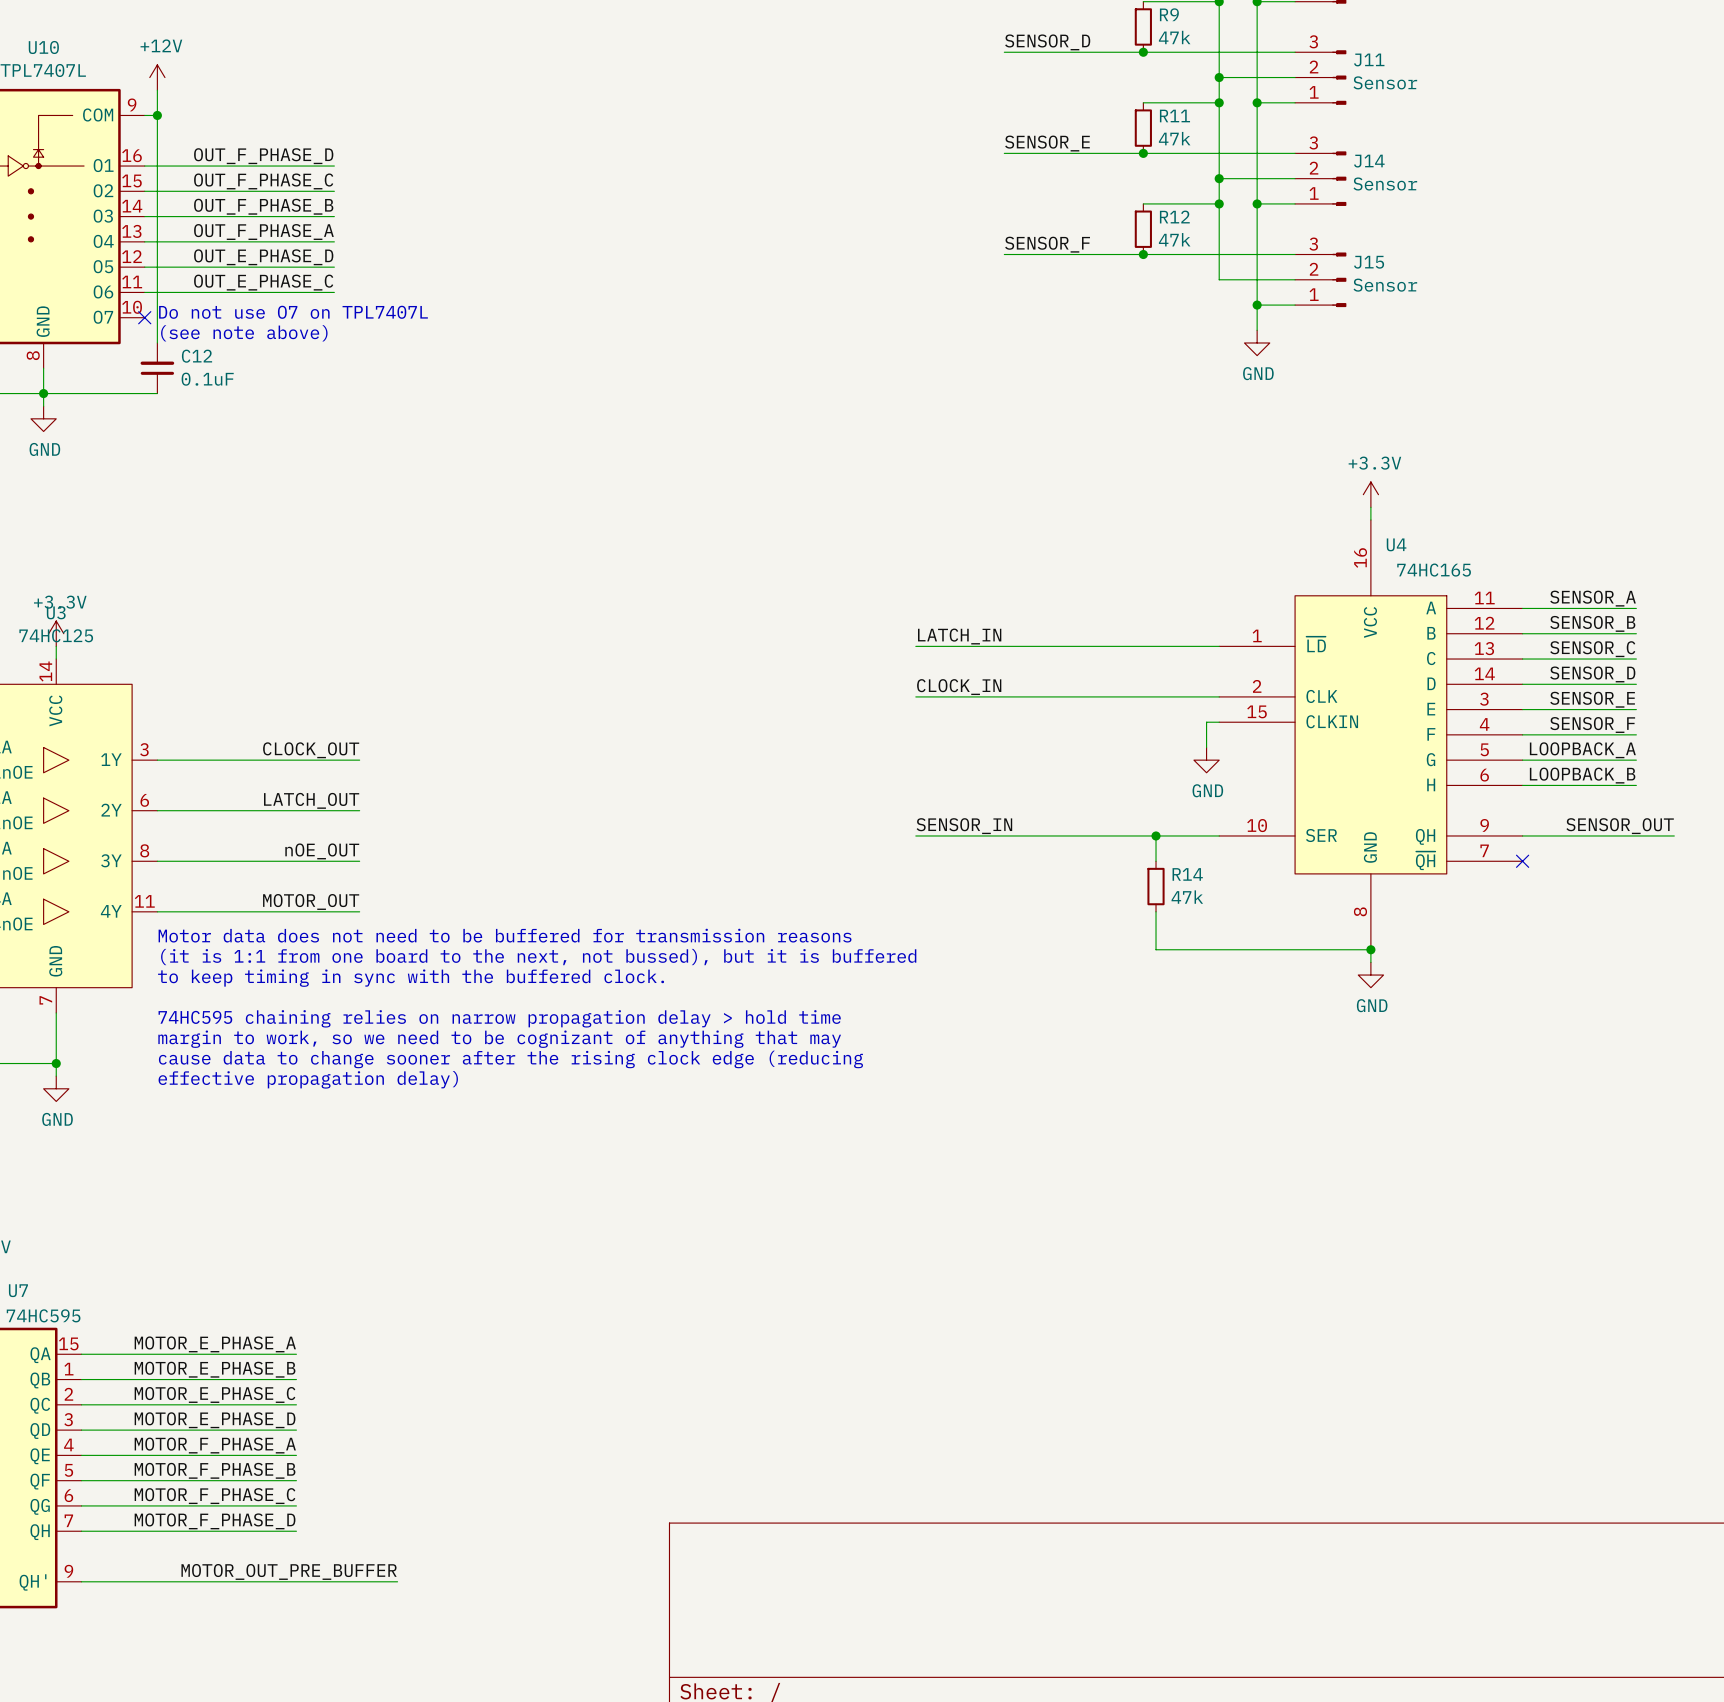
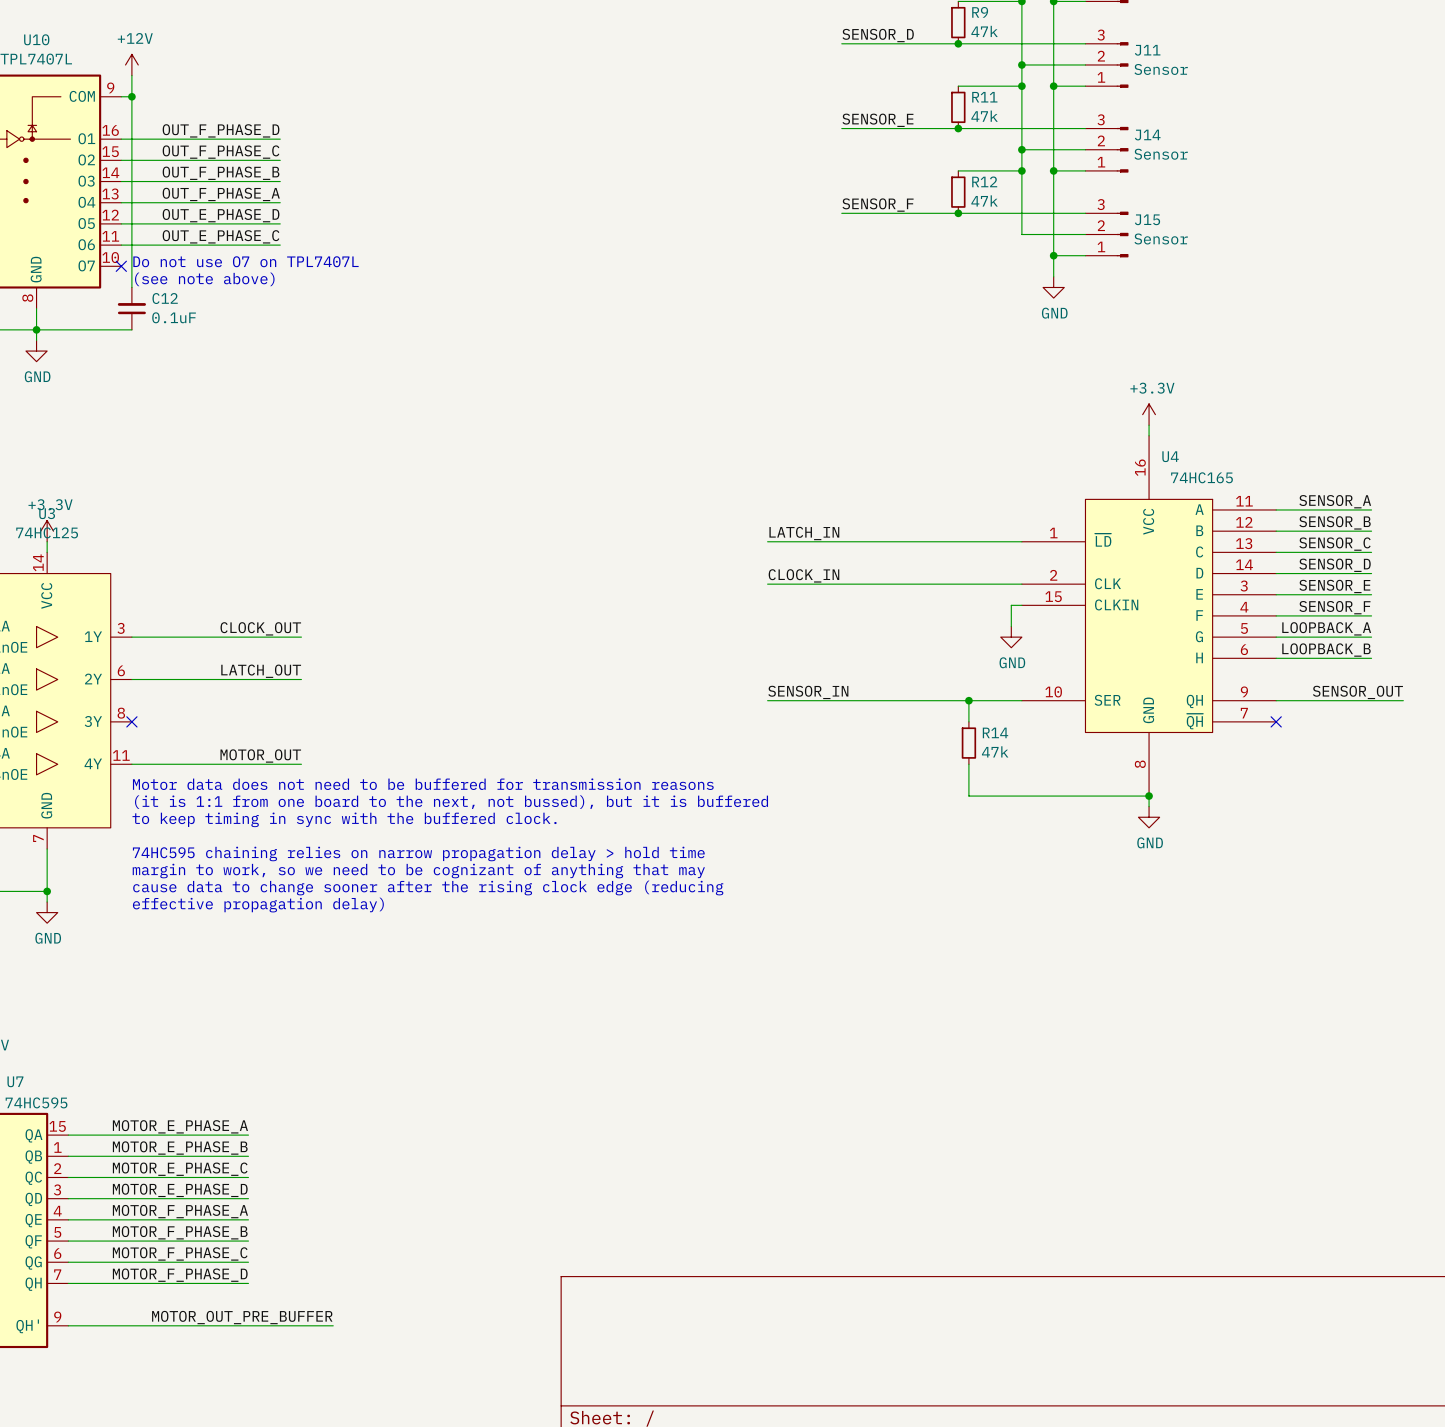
label: nOE_OUT (322, 851) -> none
wire: (157, 861) (359, 861) -> none
no-connect mark: none -> (131, 721)

